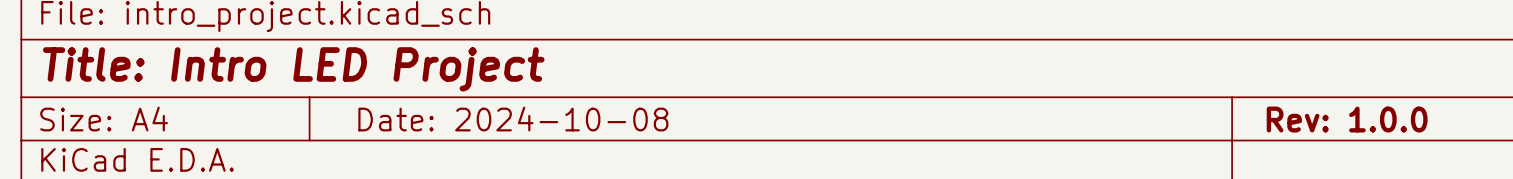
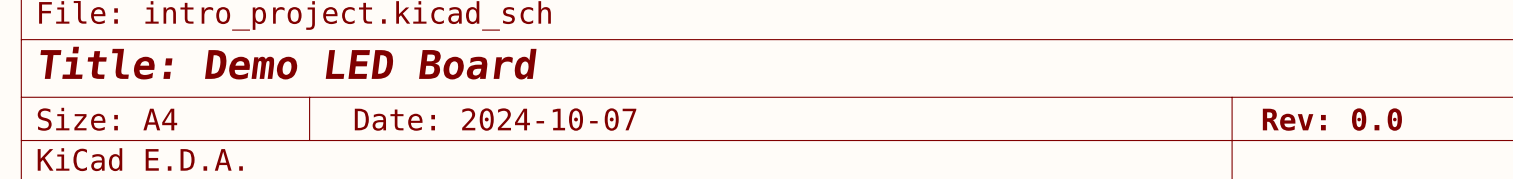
title block: Title: Intro LED Project (293, 69) -> Title: Demo LED Board (288, 63)
title block: Date: 2024-10-08 (513, 119) -> Date: 2024-10-07 (495, 119)
title block: Rev: 1.0.0 (1347, 119) -> Rev: 0.0 (1332, 119)

